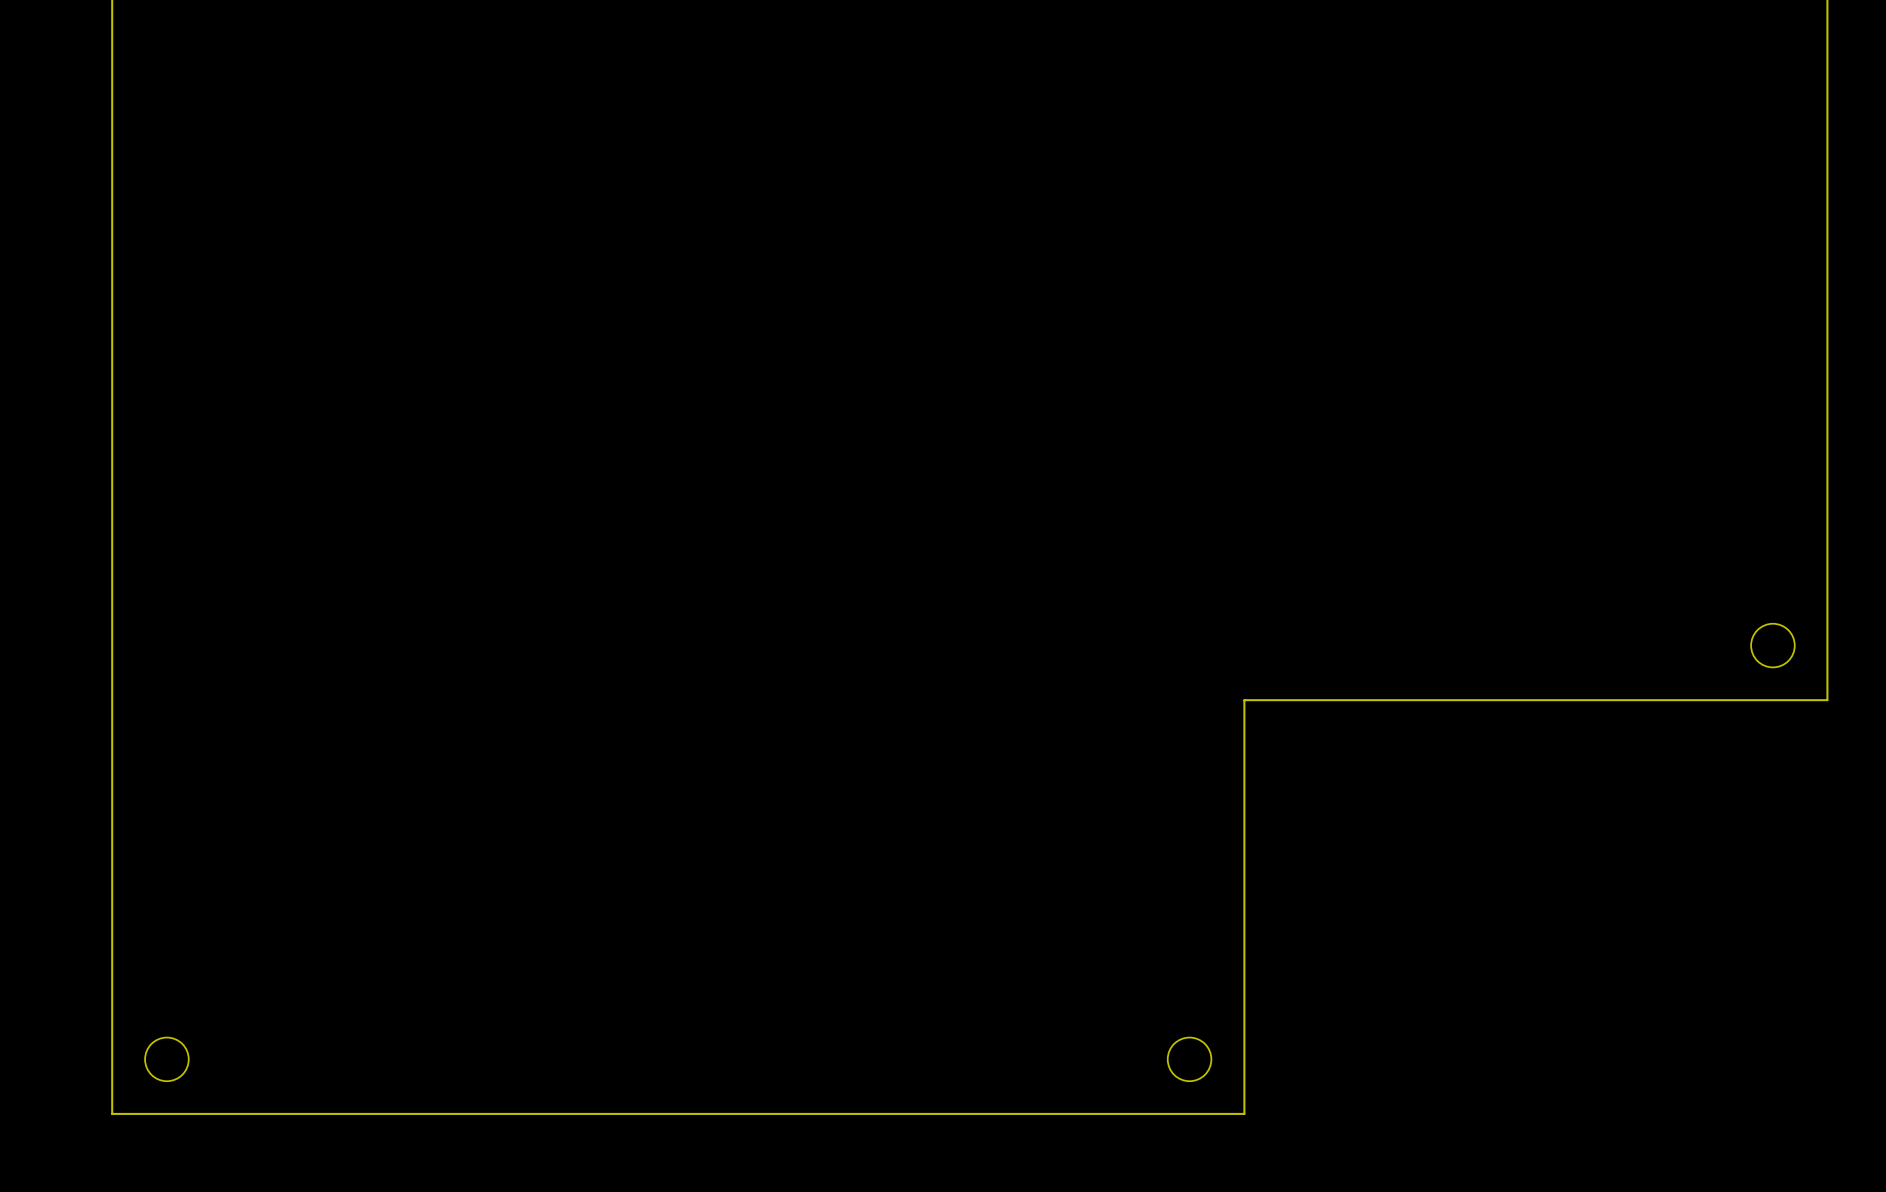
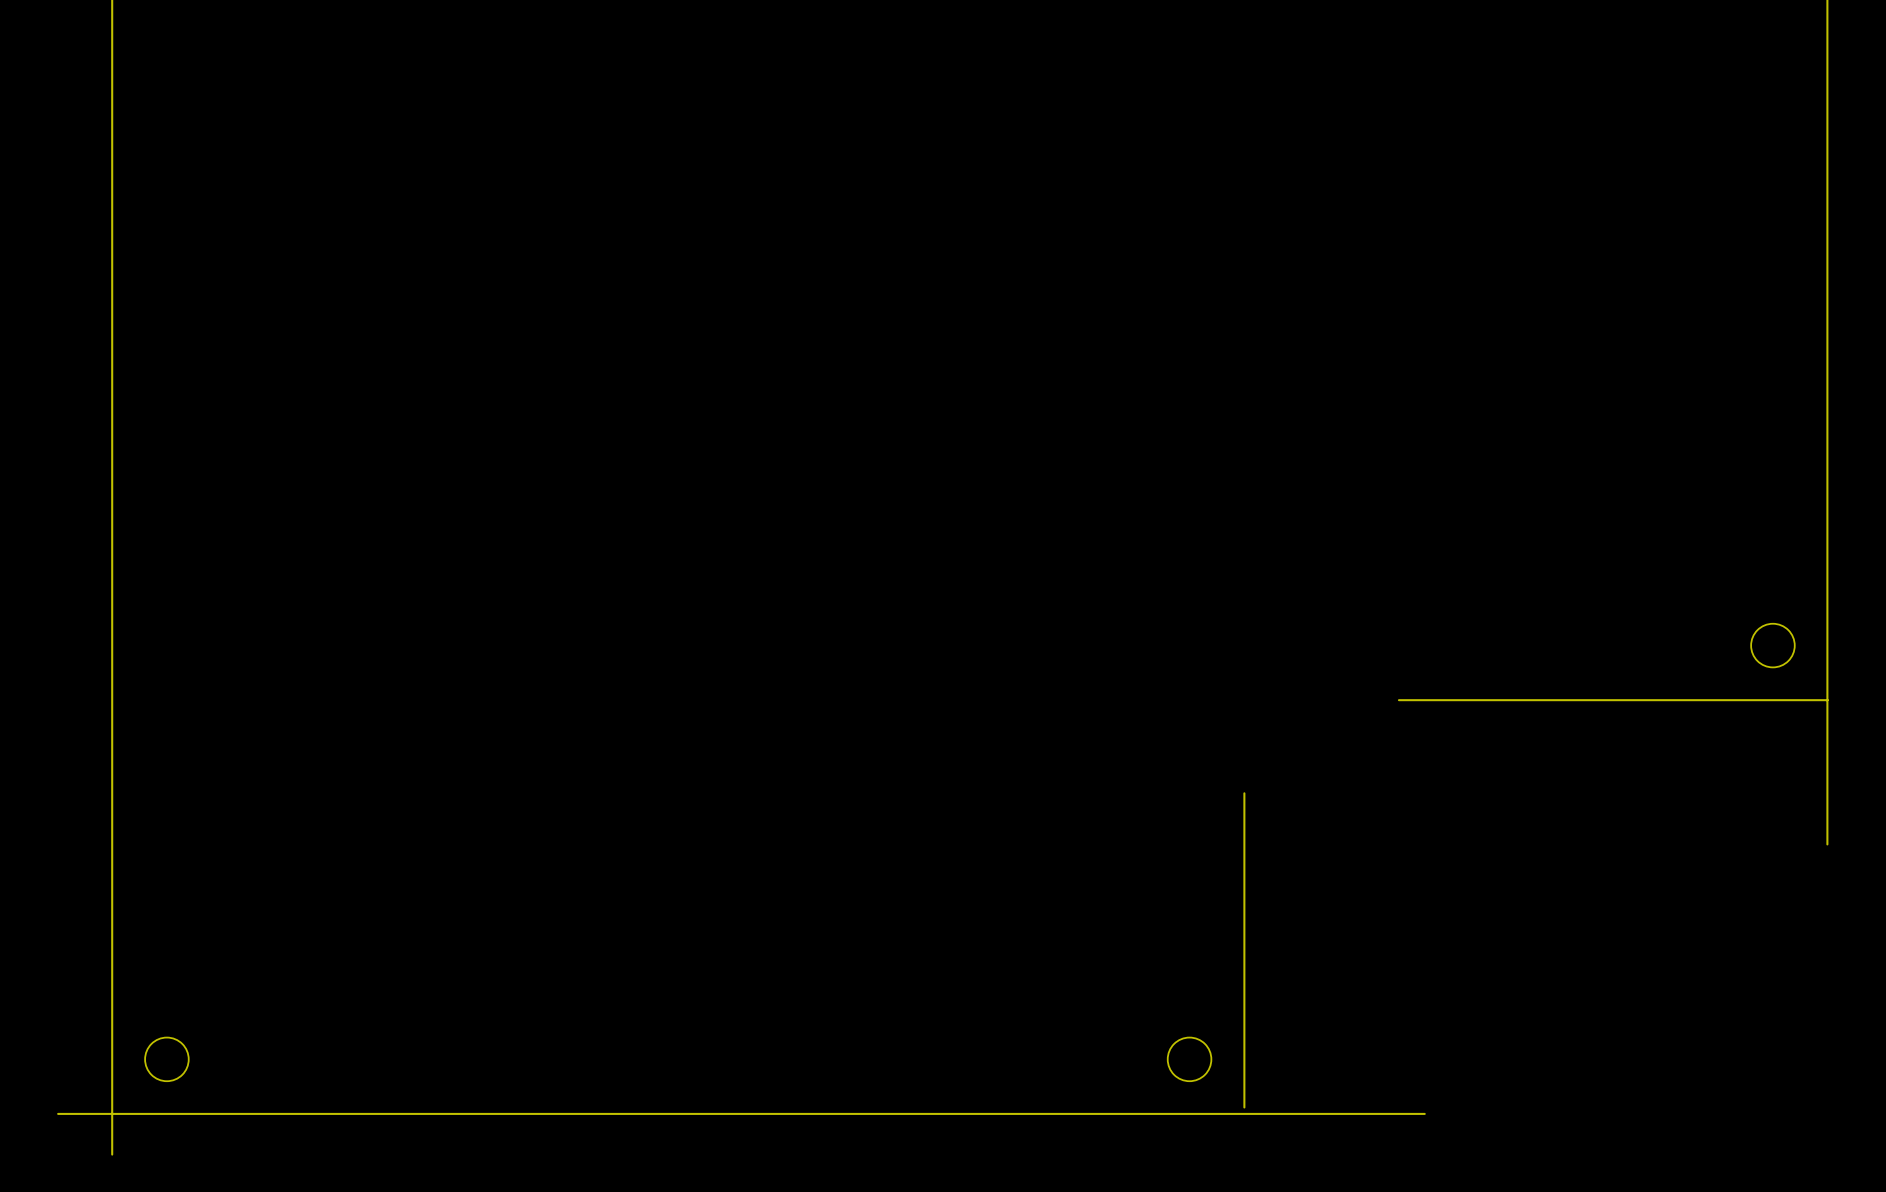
board edge: (1398, 700) (1244, 700) (1244, 793) -> none
board edge: none -> (1827, 700) (1827, 844)
board edge: (1244, 1107) (1244, 1113) -> (1424, 1113) (1244, 1113)
board edge: none -> (58, 1113) (112, 1113) (112, 1154)

